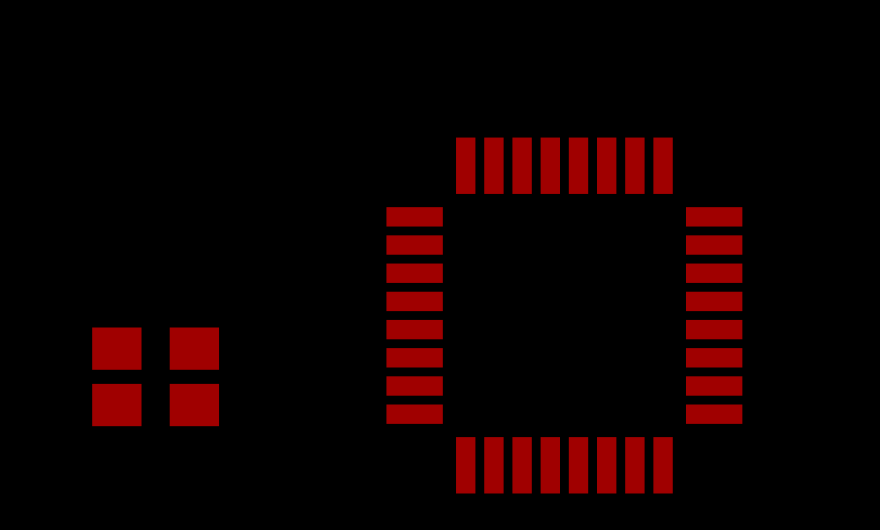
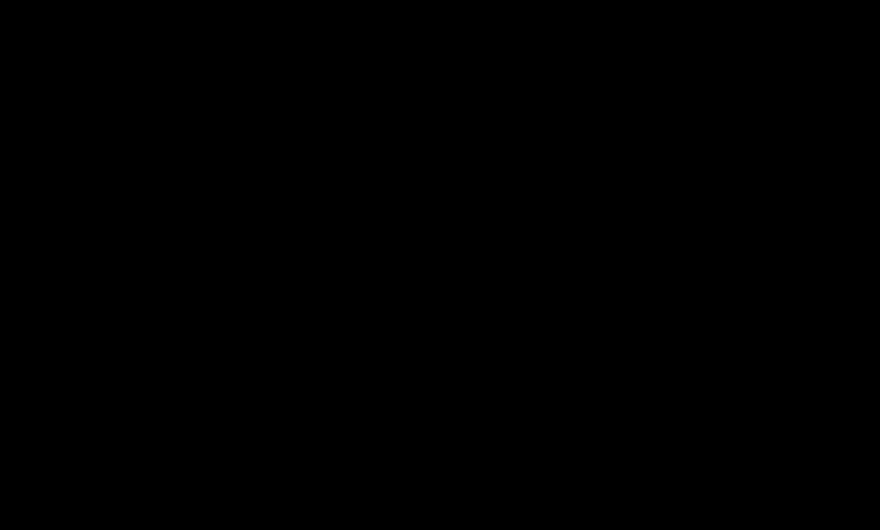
part: (564, 315) -> none
part: (155, 376) -> none

